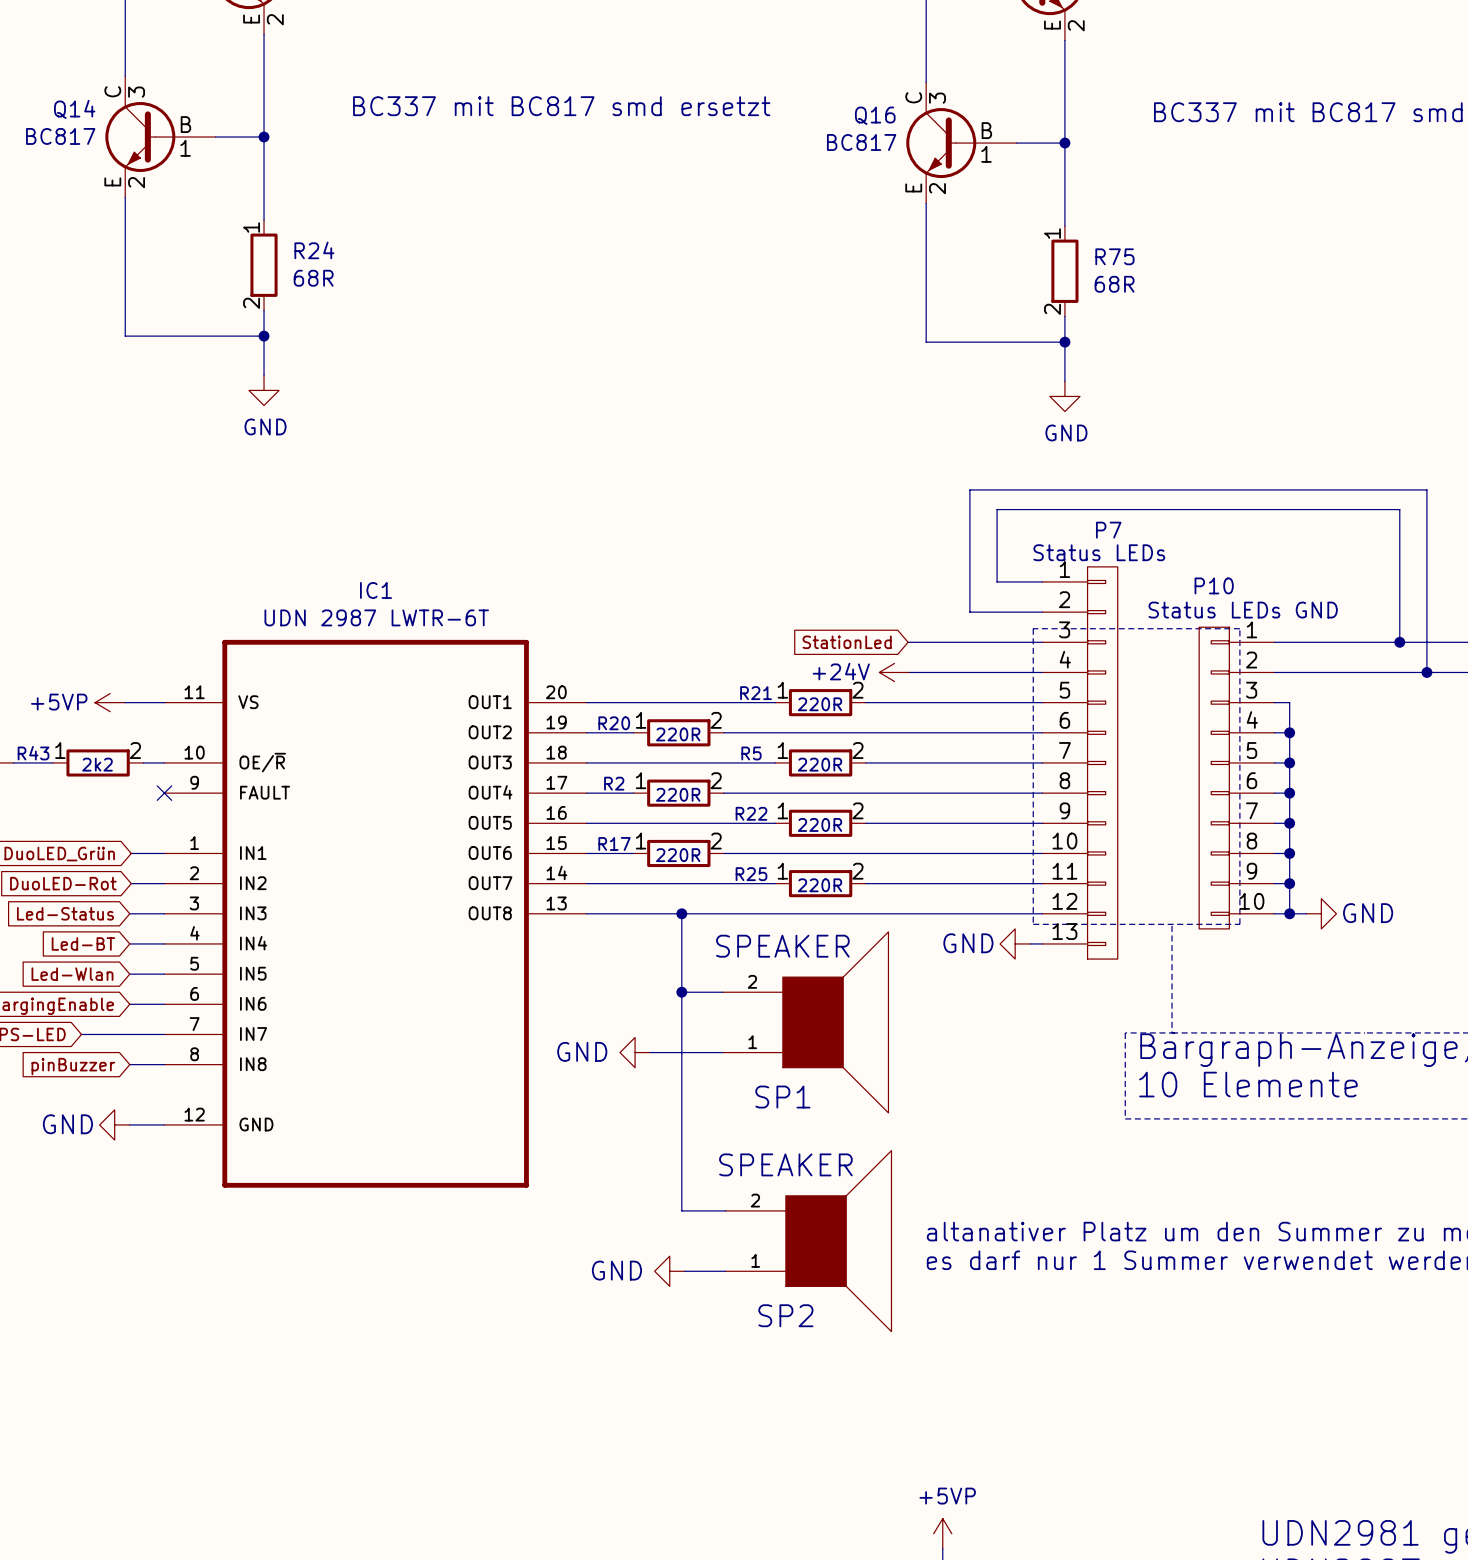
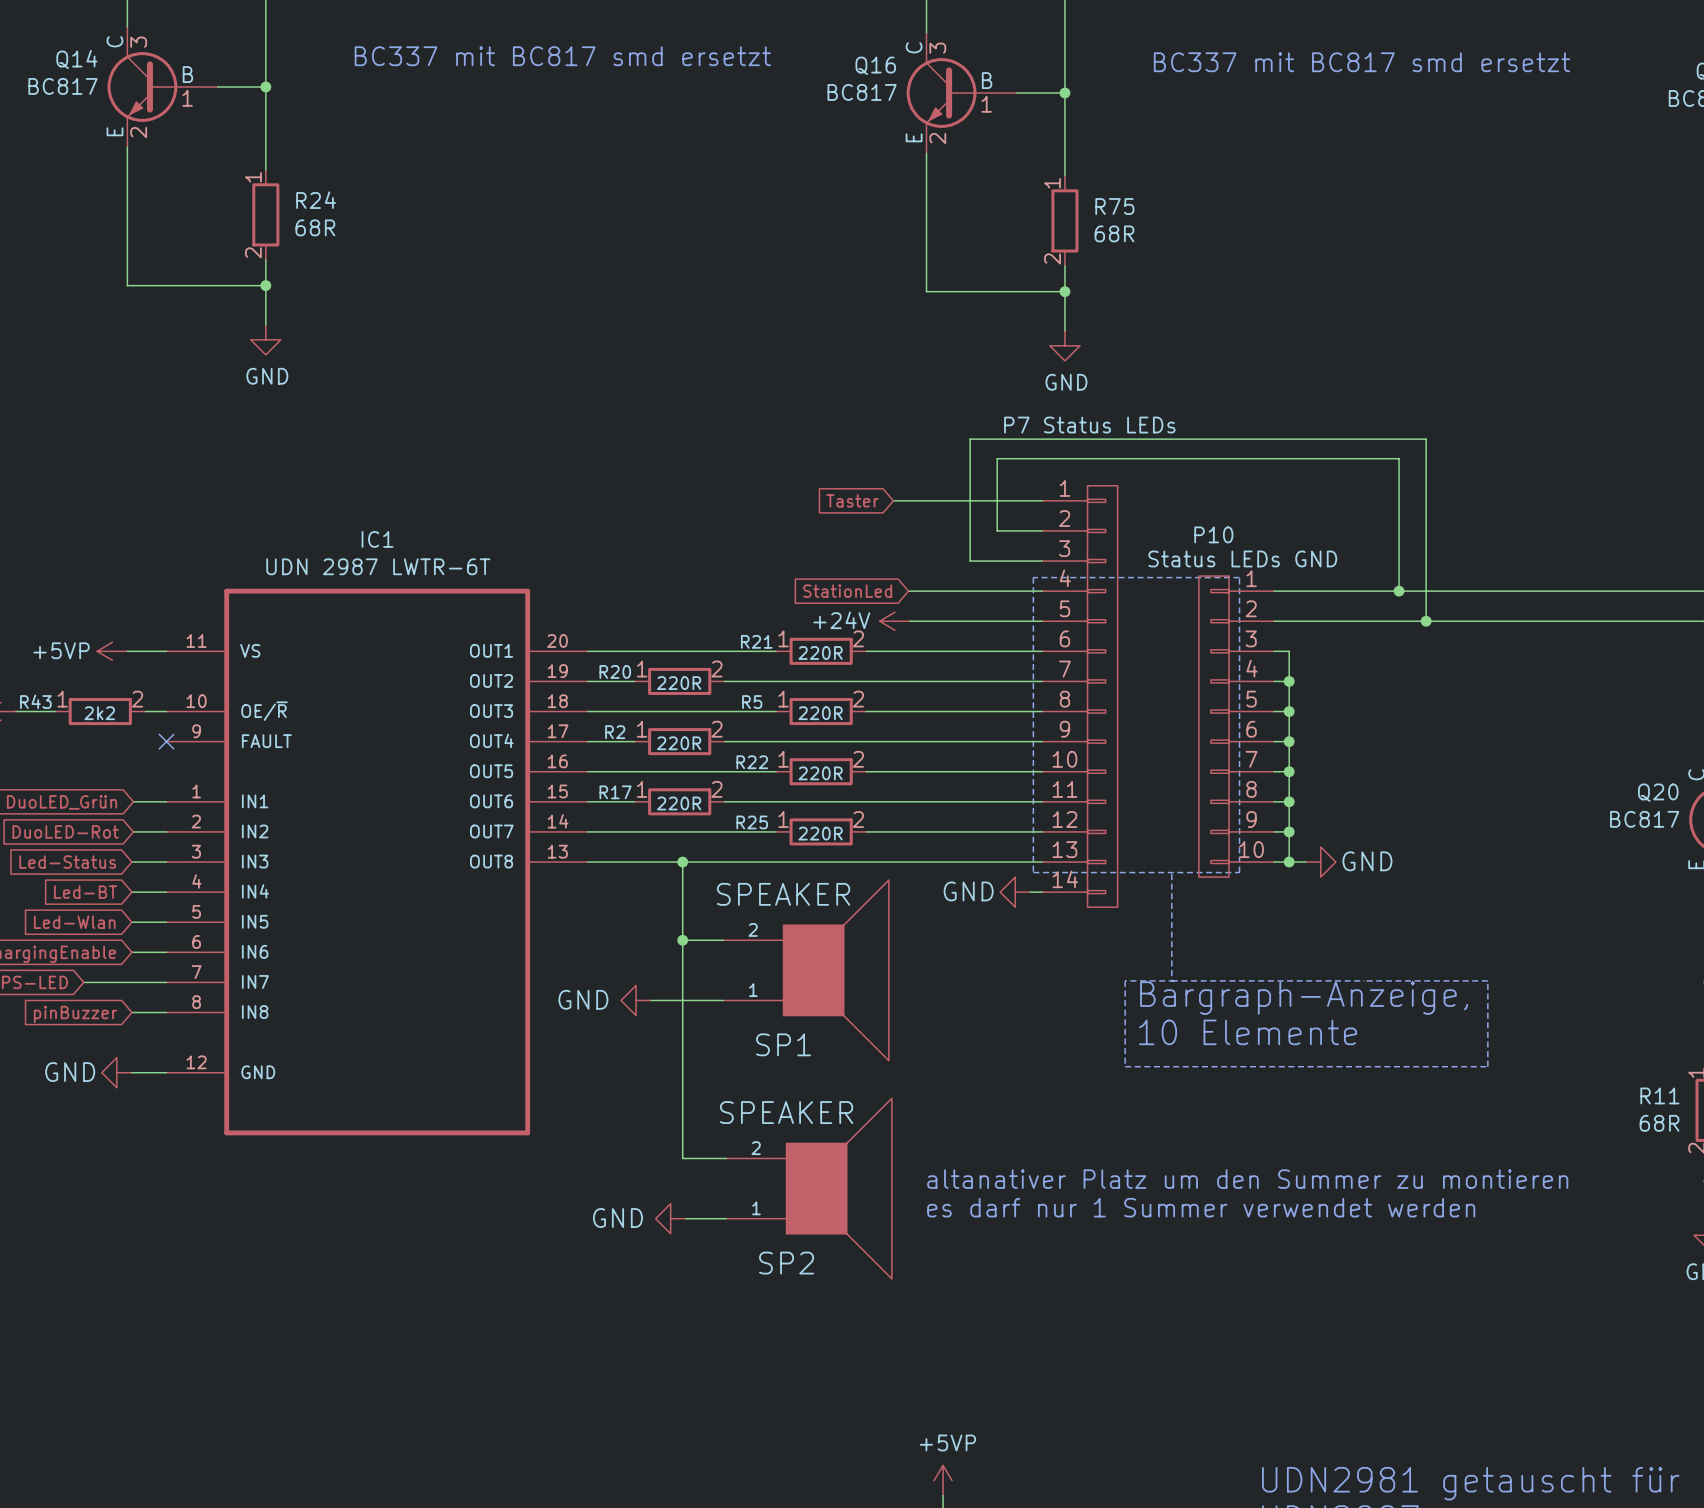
P7 name position: P7 (1108, 530) -> P7 (1016, 425)
global label: none -> Taster (852, 500)
wire: none -> (893, 500) (1042, 500)
P7 value position: Status LEDs (1099, 552) -> Status LEDs (1109, 425)
P7 symbol: [1042, 566, 1118, 960] -> [1042, 485, 1118, 908]

